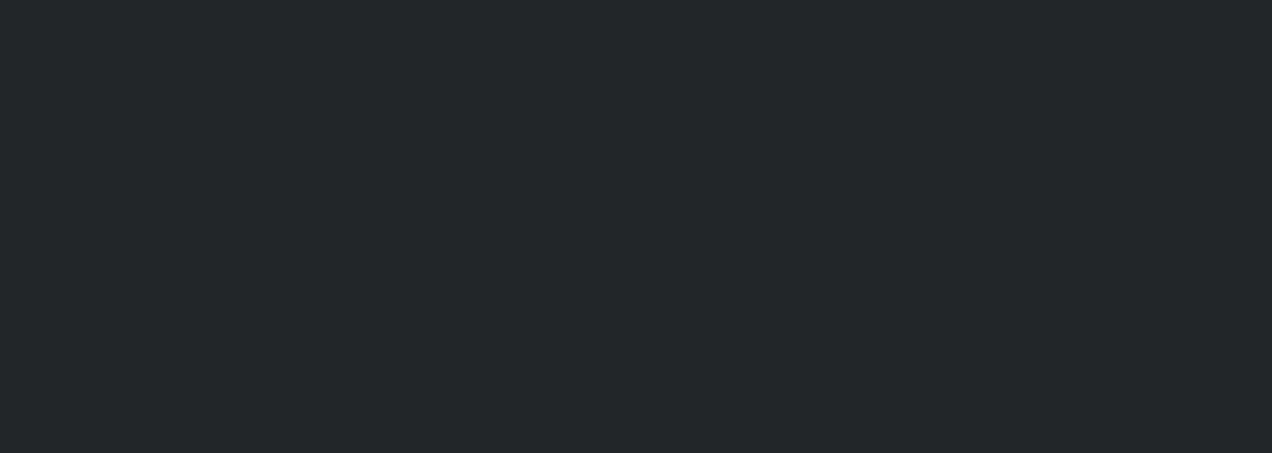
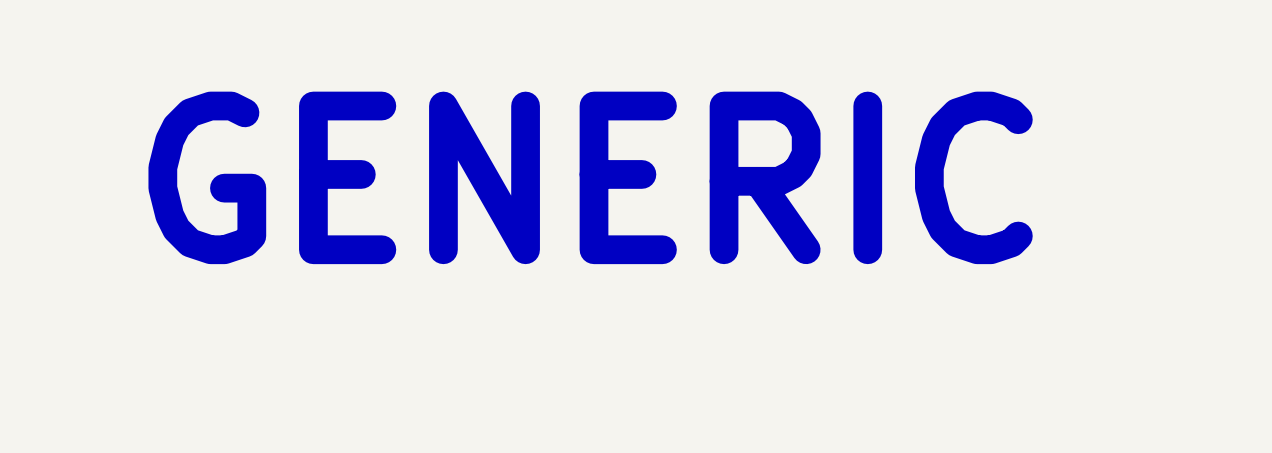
text: none -> GENERIC (590, 177)

